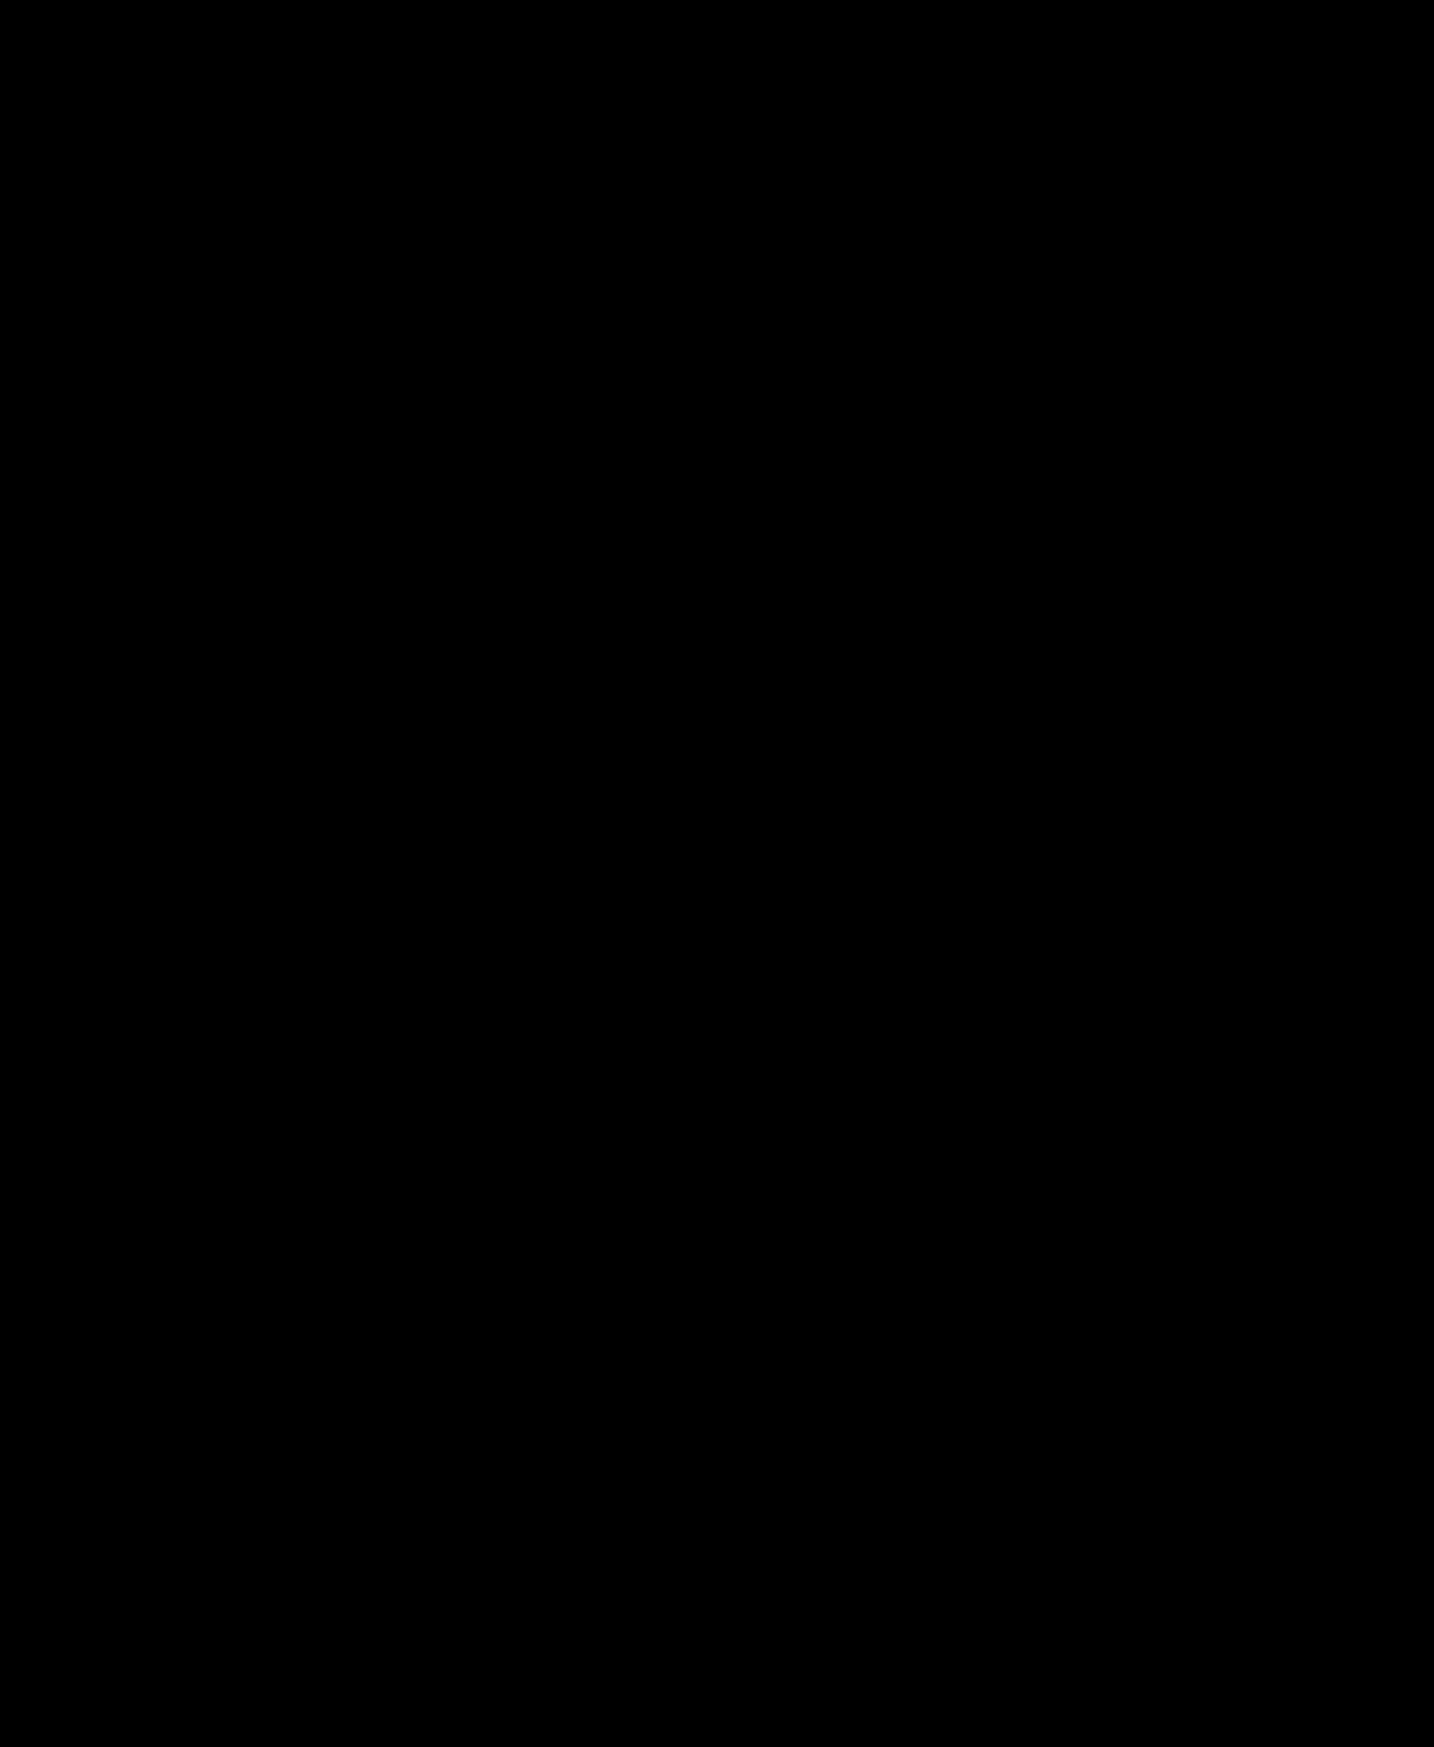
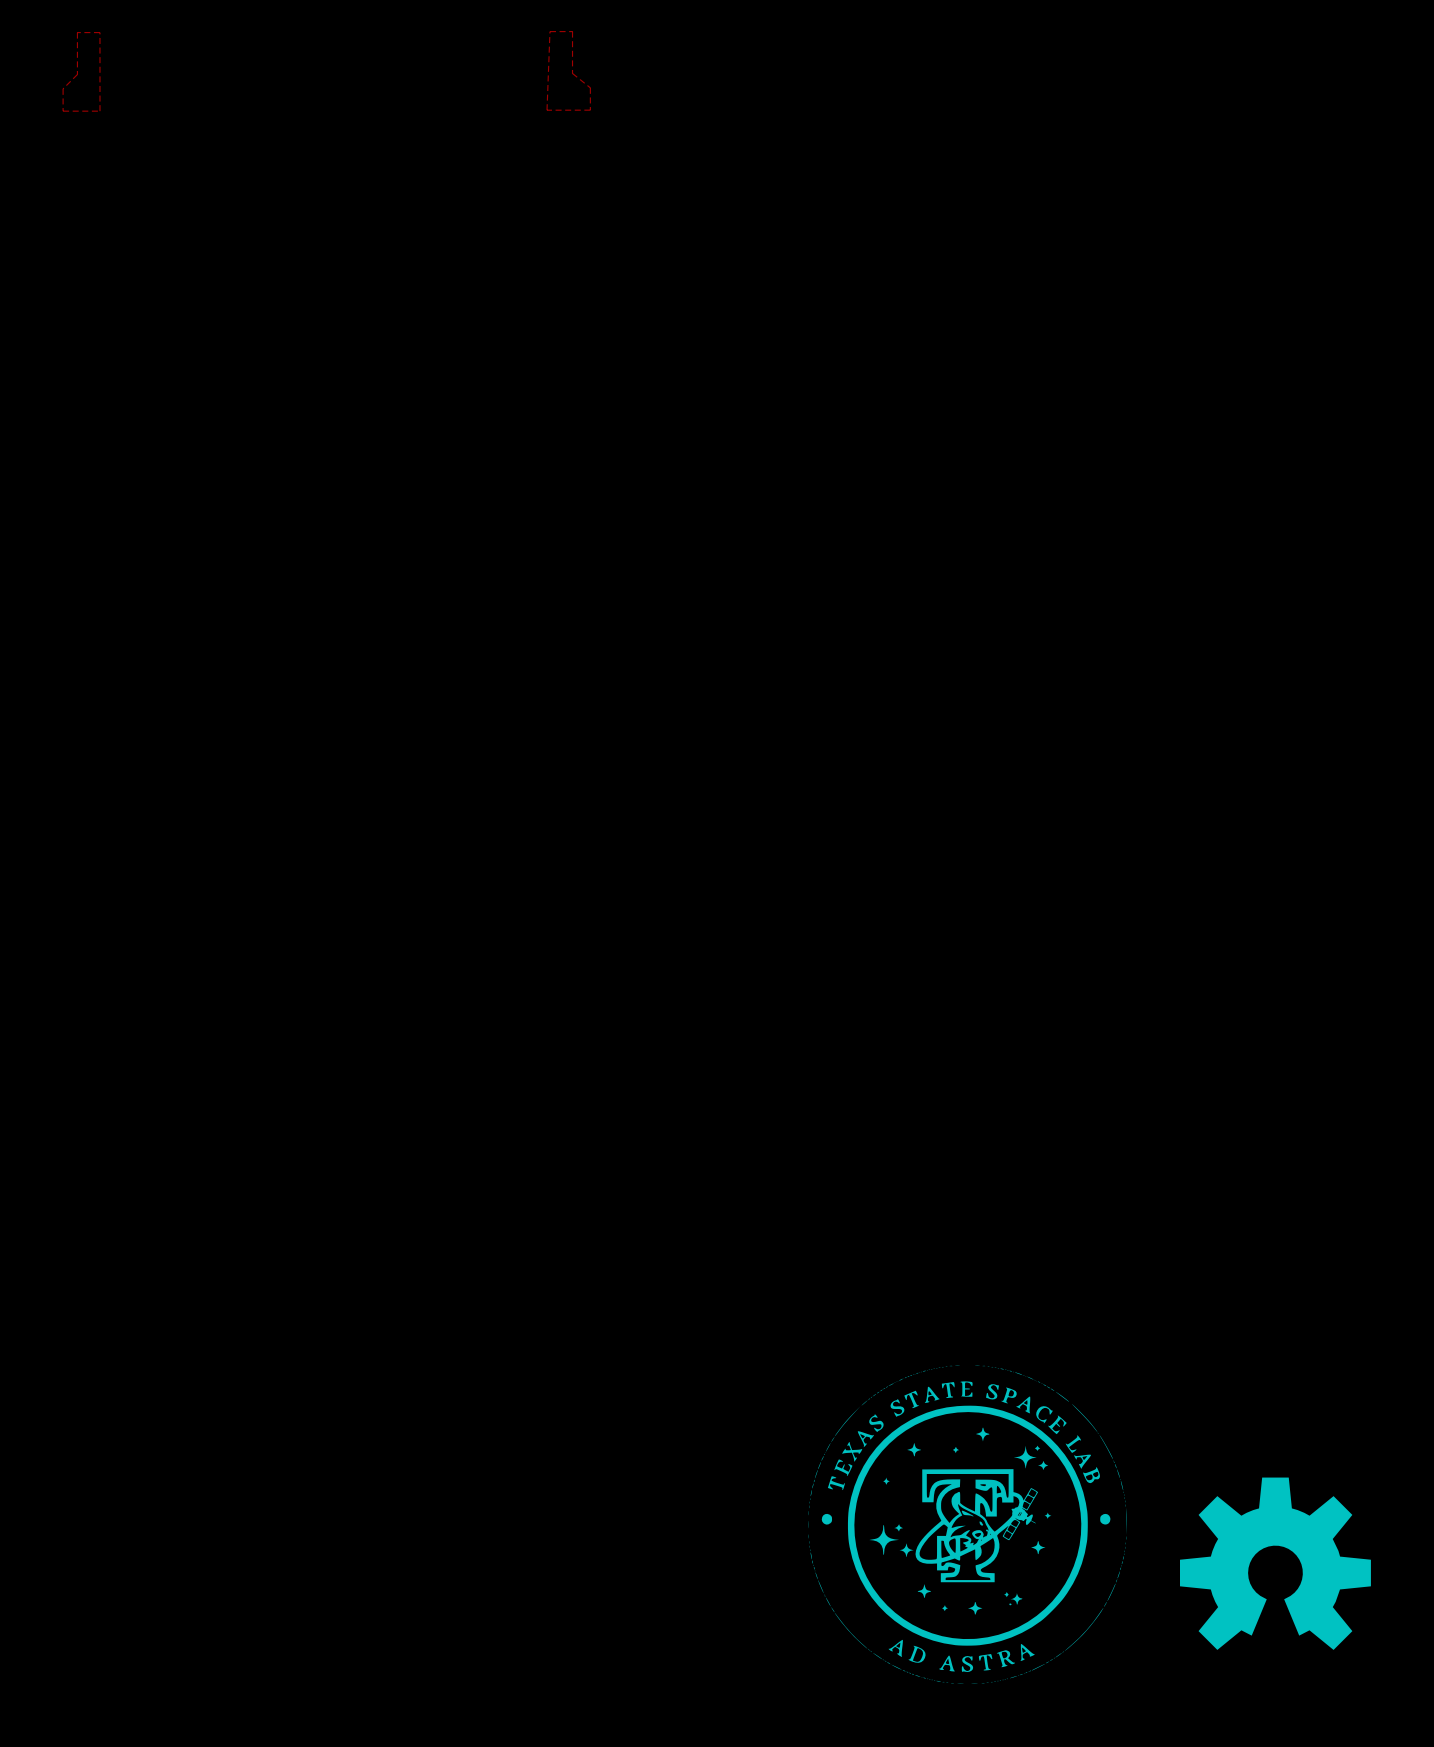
top zone outline: none -> (572, 31) (549, 31) (547, 110) (590, 110) (590, 87) (572, 73) (572, 31)
top zone outline: none -> (99, 32) (77, 32) (77, 74) (63, 88) (63, 111) (99, 111) (99, 32)
drawing: none -> [808, 1365, 1127, 1684]
drawing: none -> [1180, 1477, 1371, 1650]

